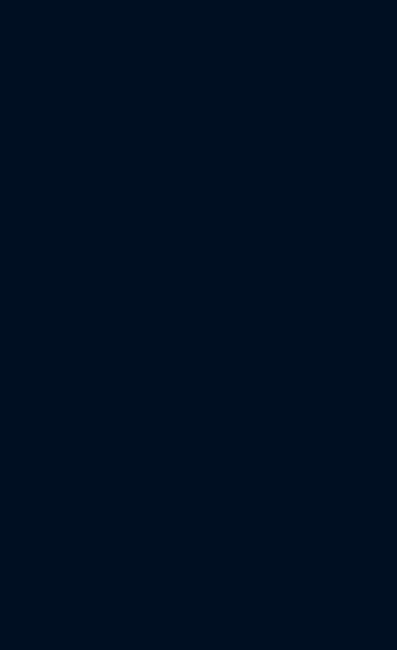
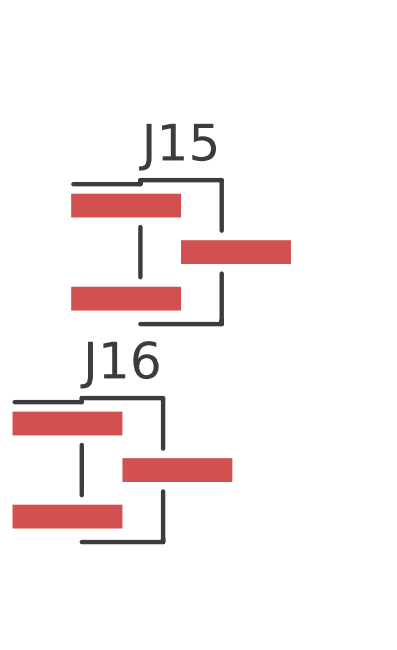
J15: none -> (181, 252)
J16: none -> (122, 470)

